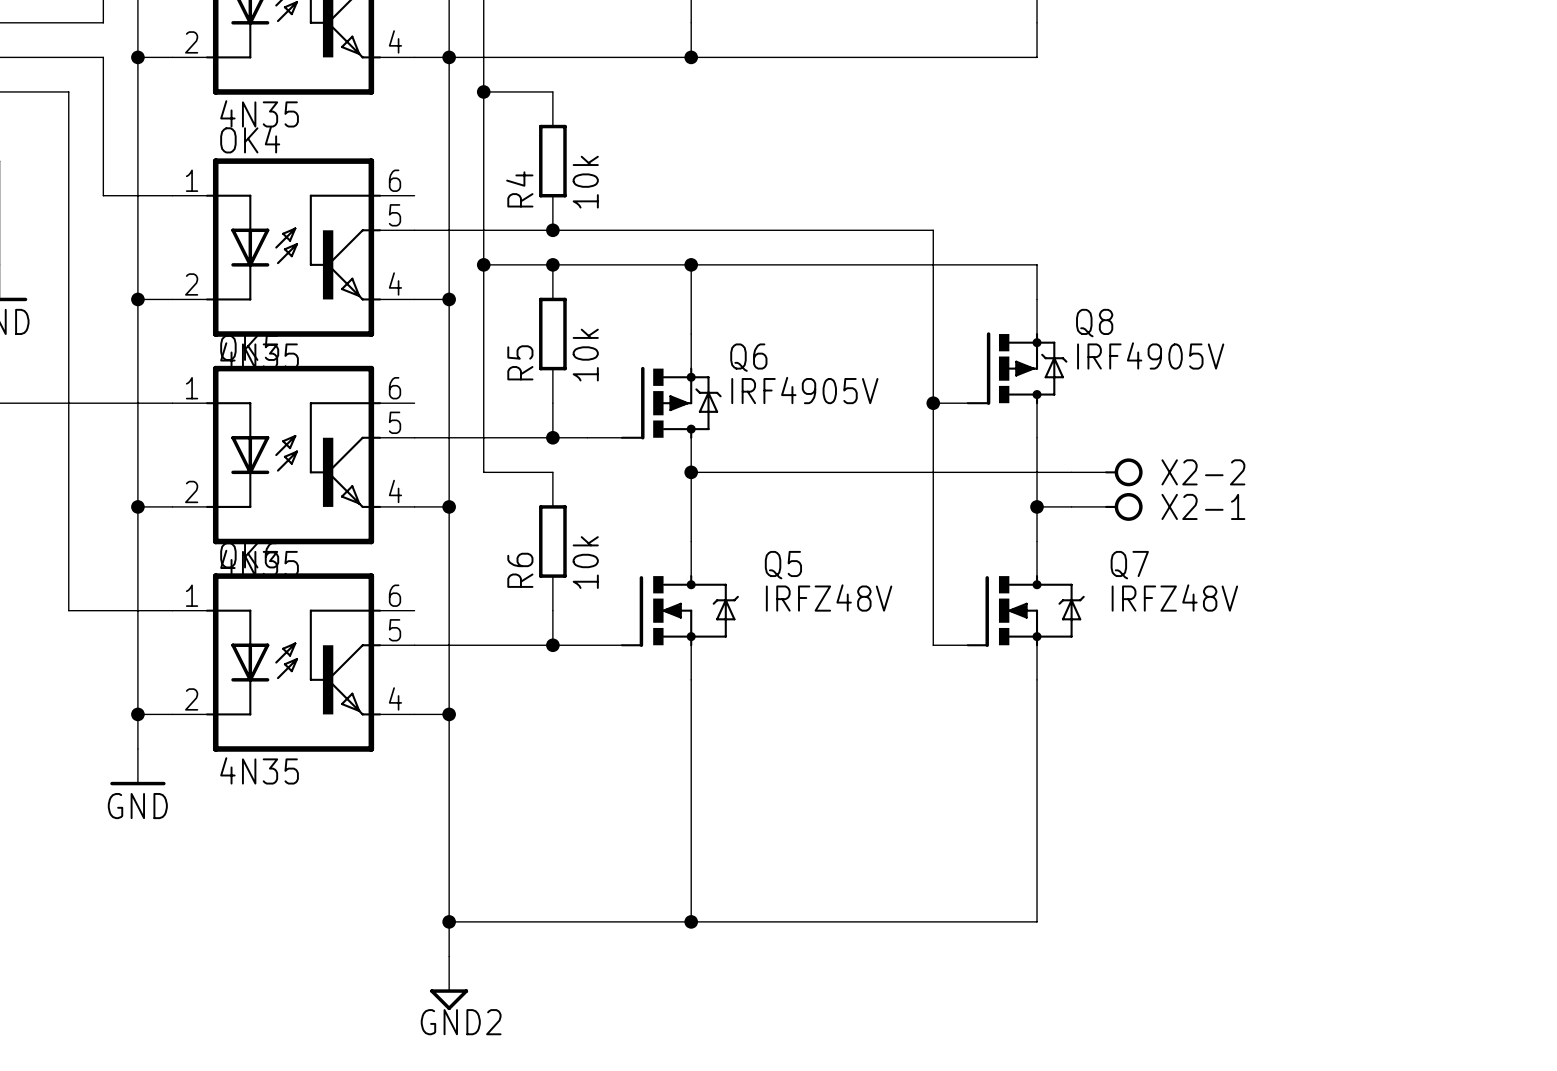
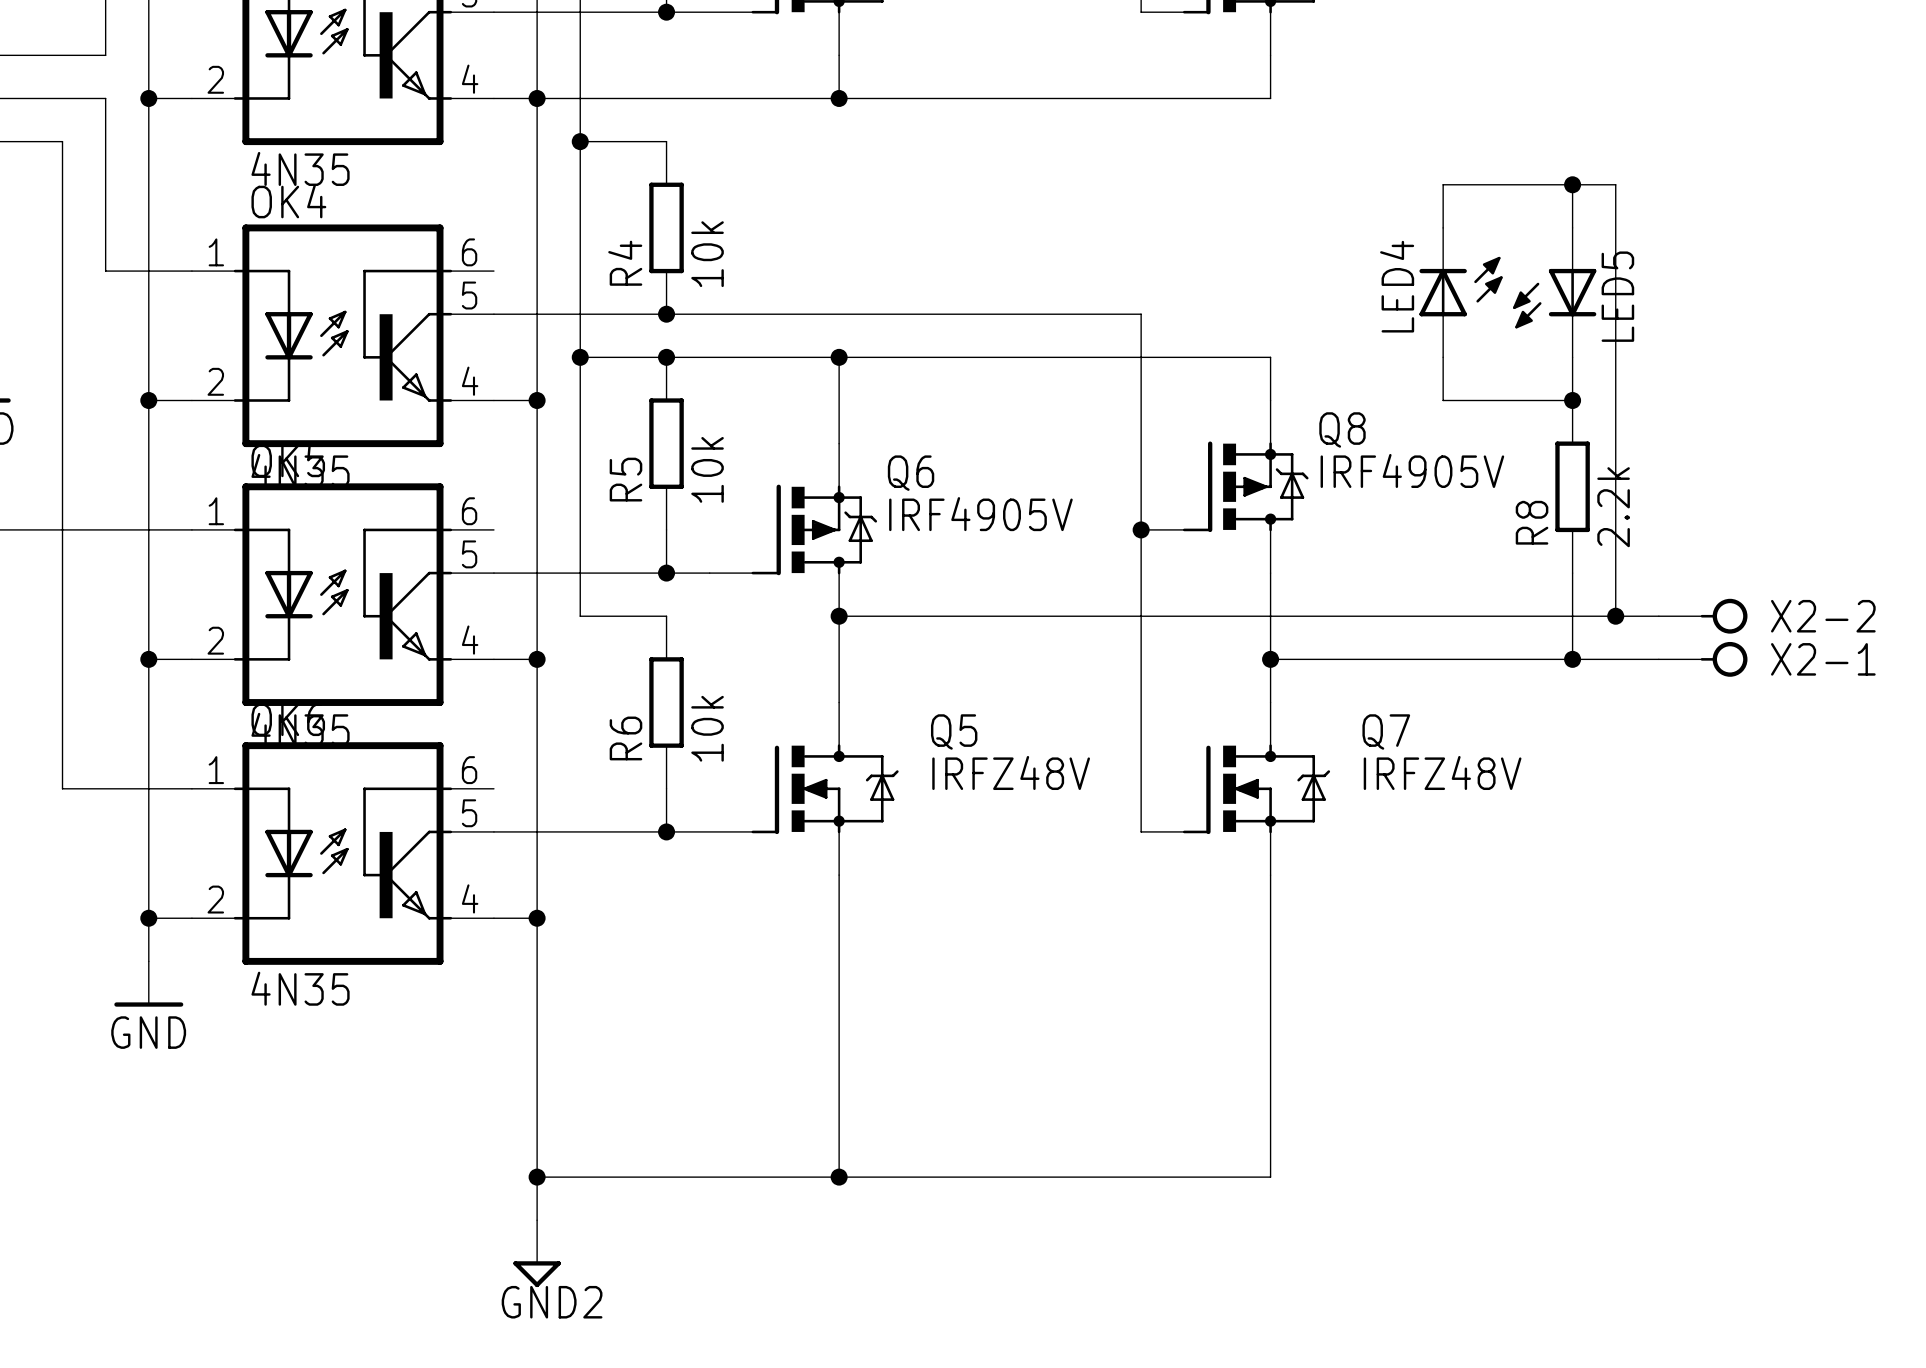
wire: none -> (1572, 184) (1572, 227)
junction: none -> (1572, 184)
wire: none -> (1443, 227) (1443, 184) (1615, 184) (1615, 616)
LED4: none -> (1461, 292)
LED5: none -> (1554, 292)
wire: none -> (1443, 357) (1443, 400) (1572, 400) (1572, 357)
junction: none -> (1572, 400)
R8: none -> 2.2k (1572, 486)
wire: none -> (1572, 573) (1572, 659)
wire: none -> (1313, 616) (1658, 616)
X2-2 position: (1107, 472) -> (1703, 616)
junction: none -> (1615, 616)
wire: none -> (1313, 659) (1658, 659)
X2-1 position: (1107, 506) -> (1703, 659)
junction: none -> (1572, 659)

